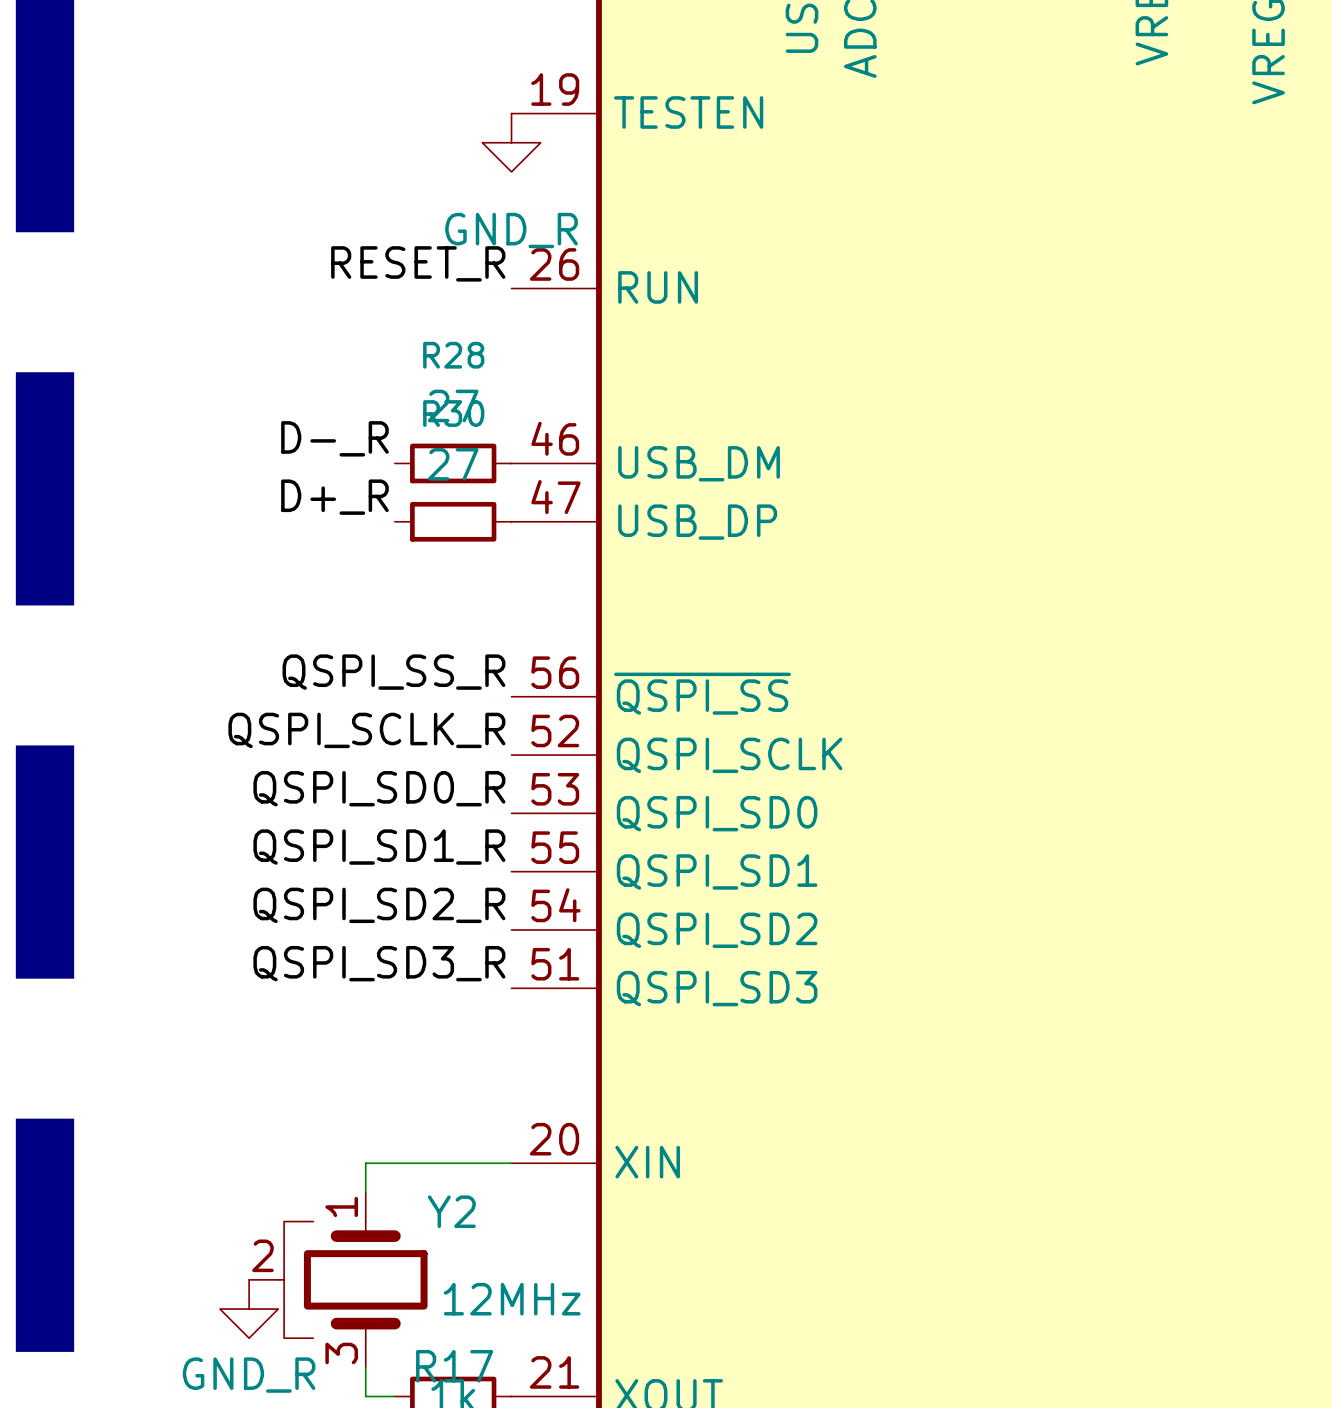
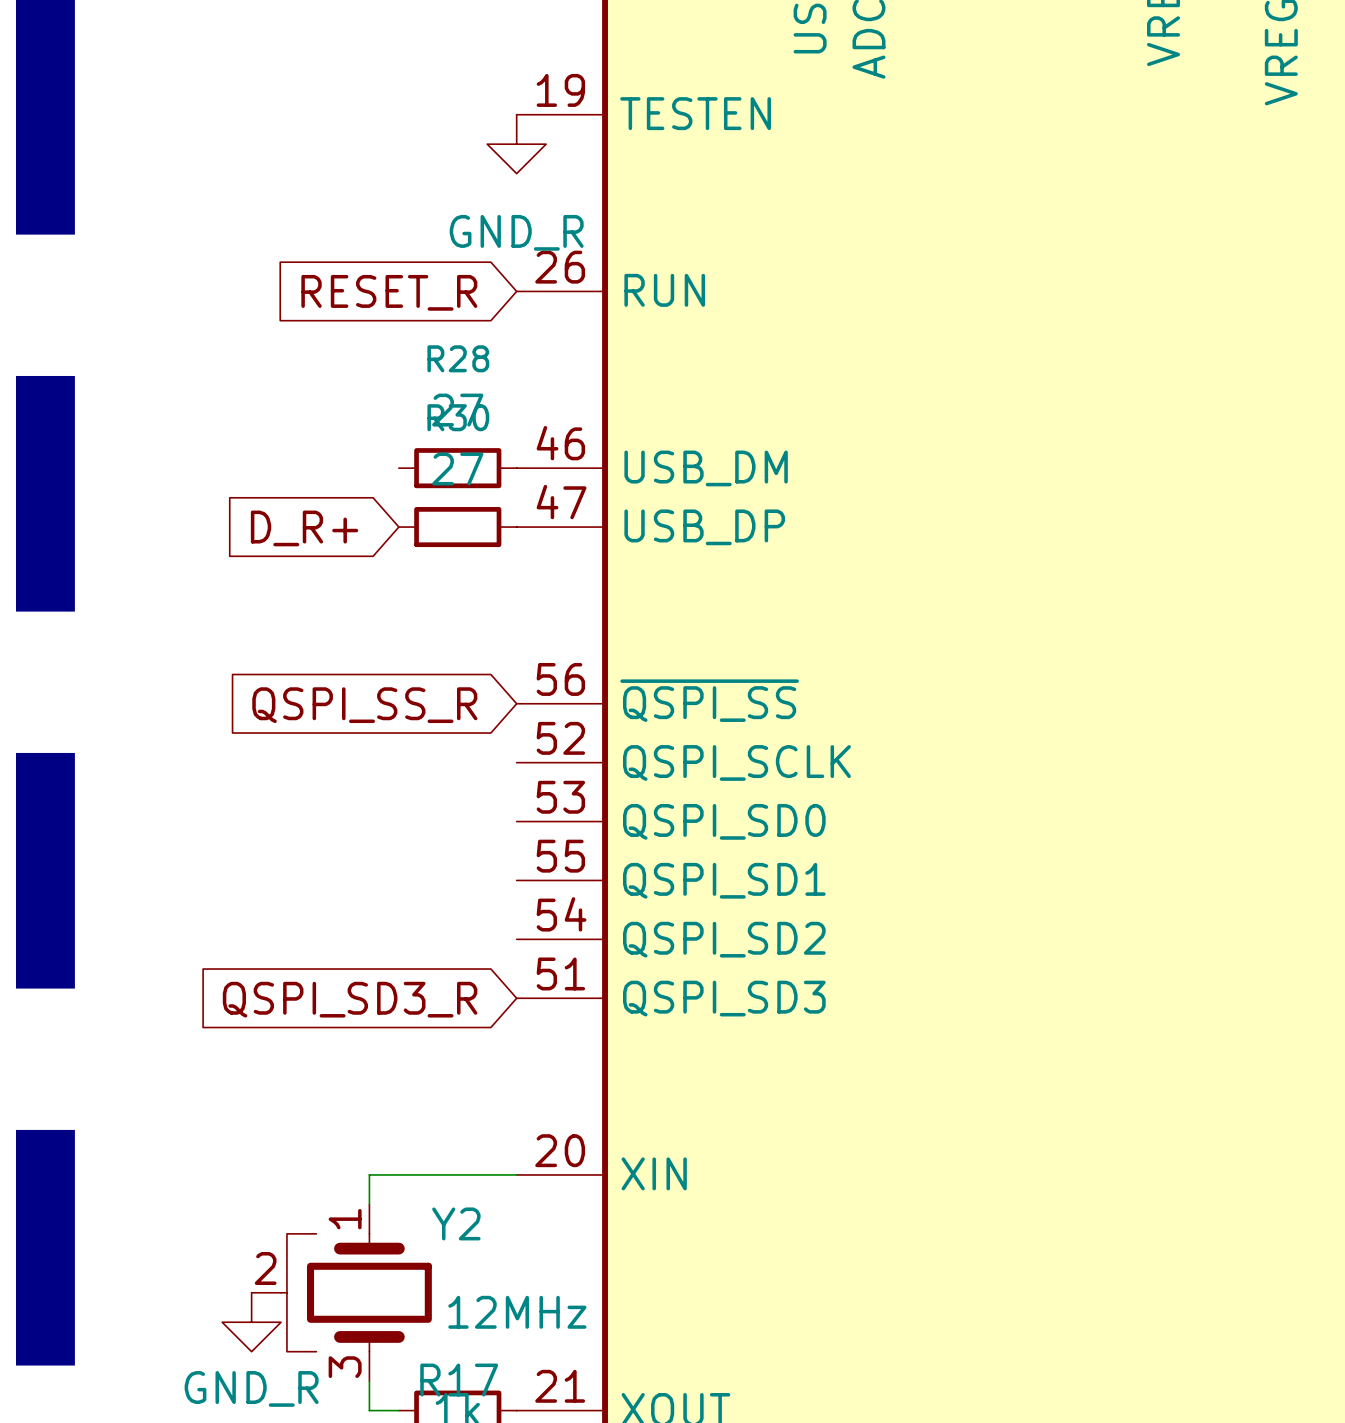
label: RESET_R (418, 263) -> none
global label: none -> RESET_R (389, 292)
label: D-_R (334, 438) -> none
label: D+_R (334, 497) -> none
global label: none -> D_R+ (304, 528)
label: QSPI_SS_R (393, 672) -> none
global label: none -> QSPI_SS_R (364, 705)
label: QSPI_SCLK_R (366, 730) -> none
label: QSPI_SD0_R (379, 788) -> none
label: QSPI_SD1_R (379, 847) -> none
label: QSPI_SD2_R (379, 905) -> none
label: QSPI_SD3_R (379, 963) -> none
global label: none -> QSPI_SD3_R (350, 999)

